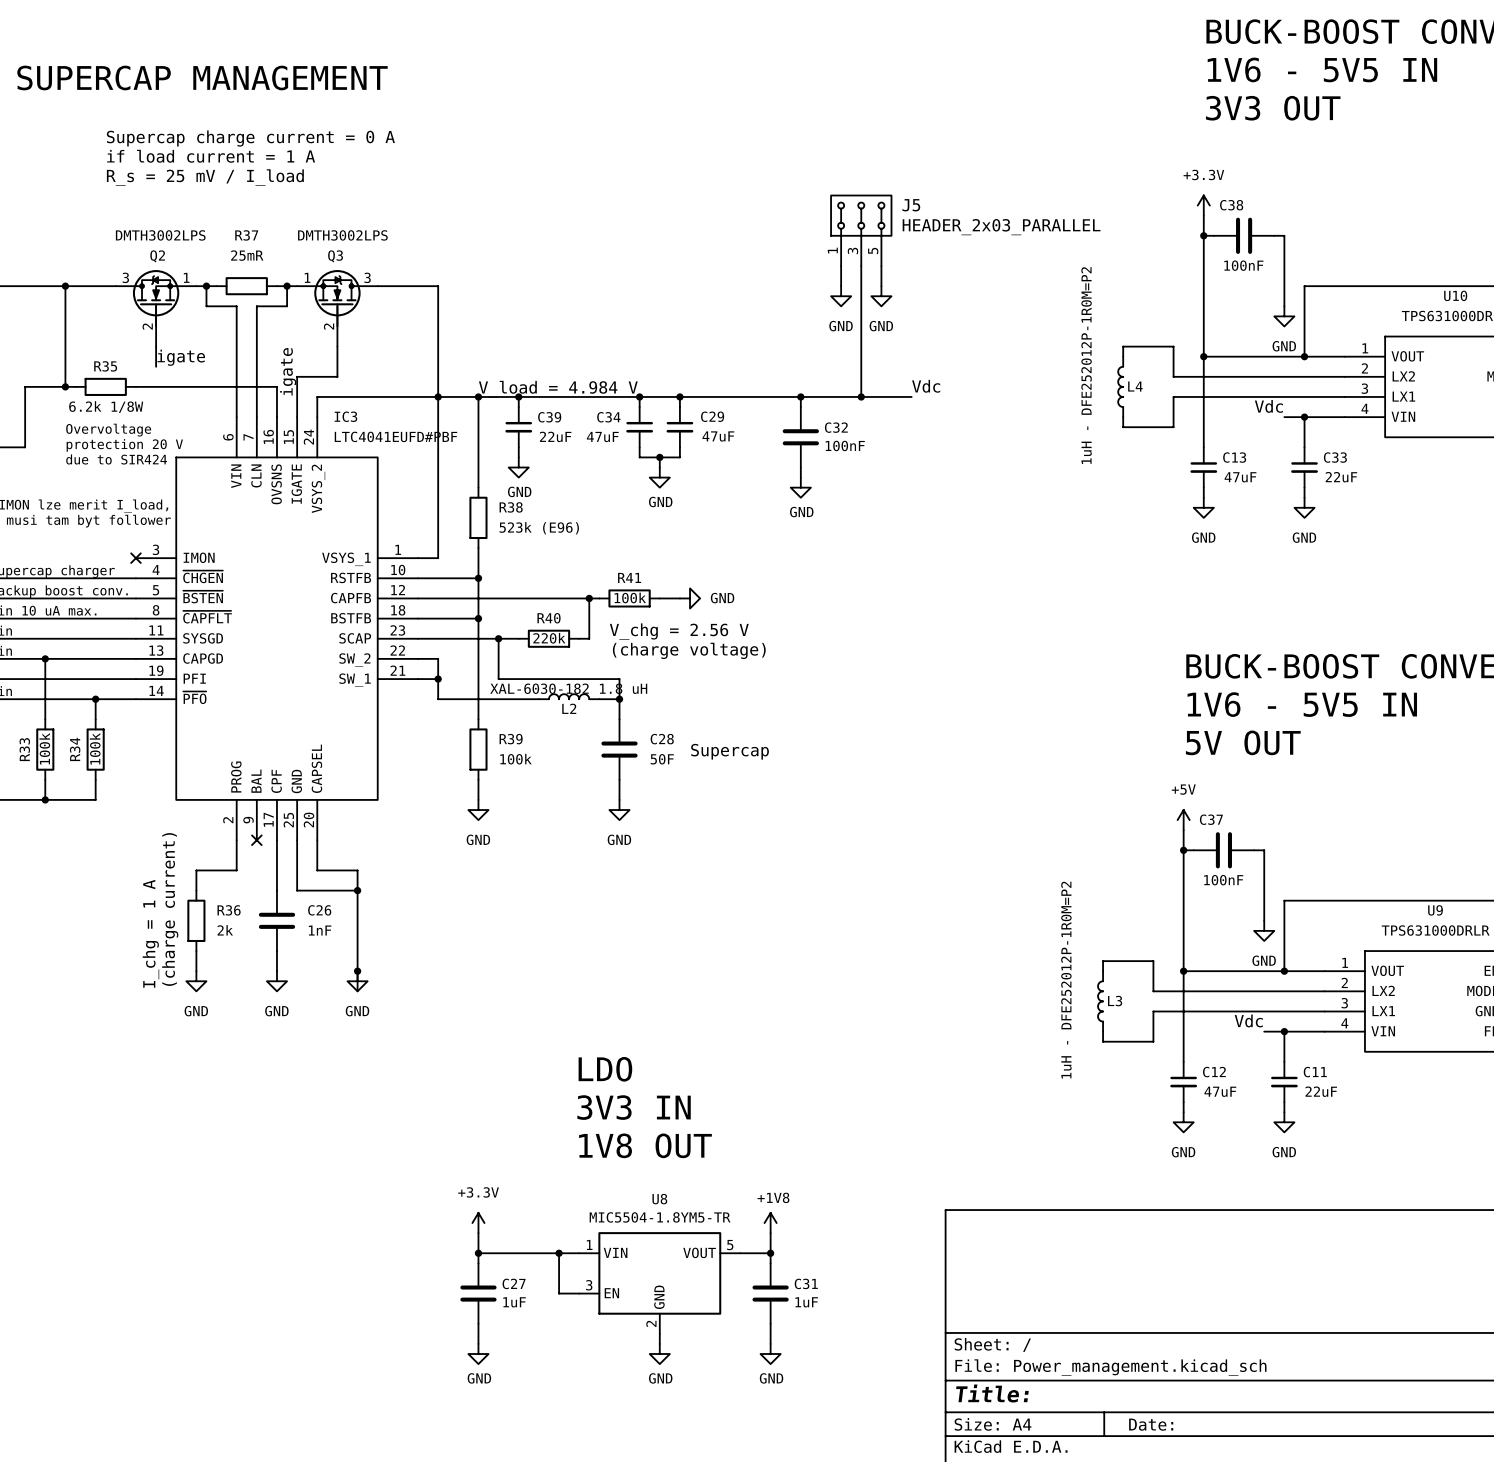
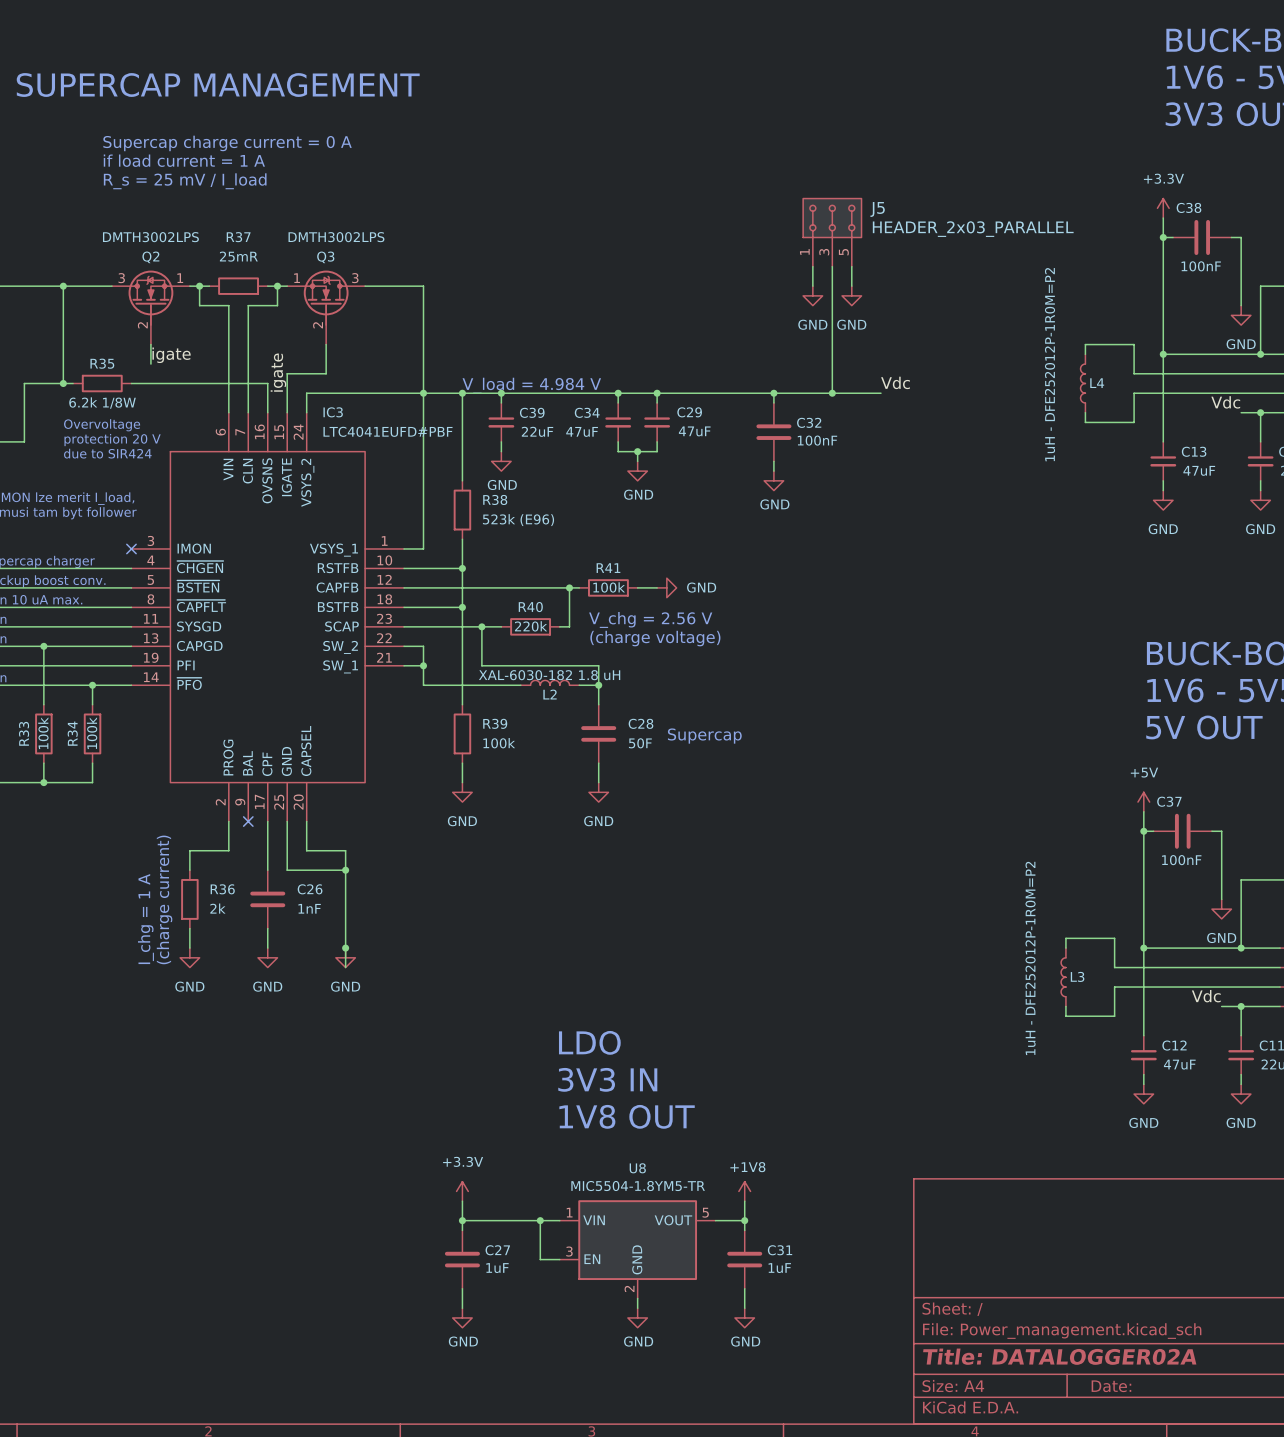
title block: Title: (992, 1393) -> Title: DATALOGGER02A (1059, 1356)

